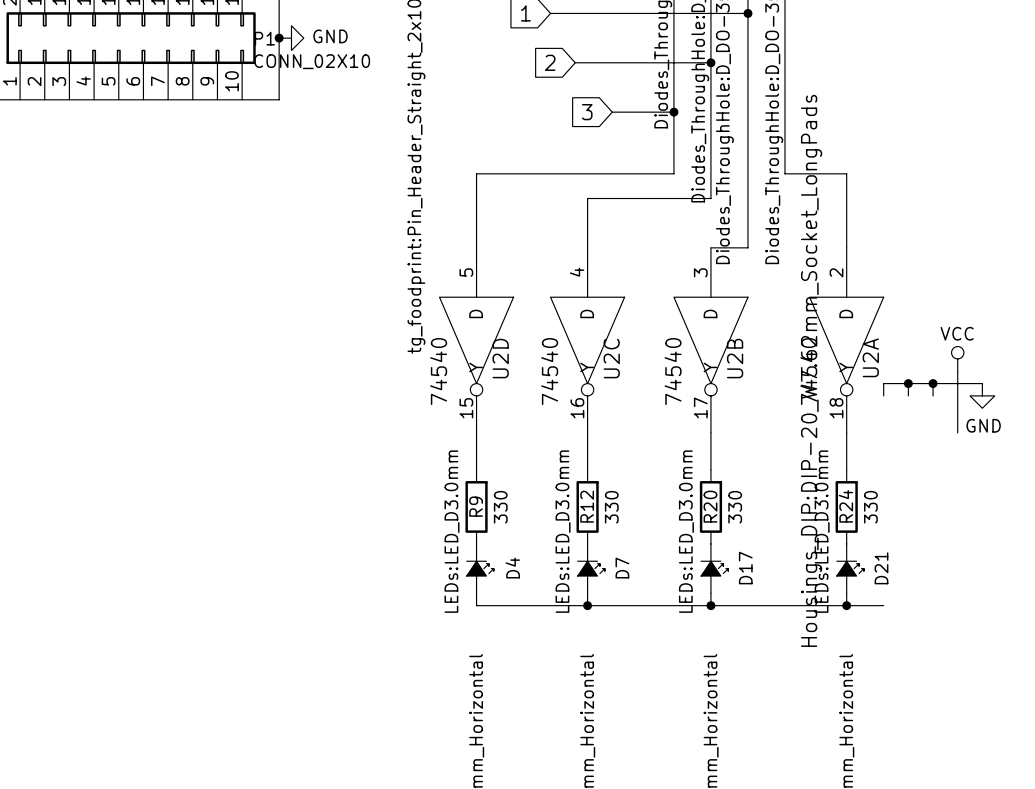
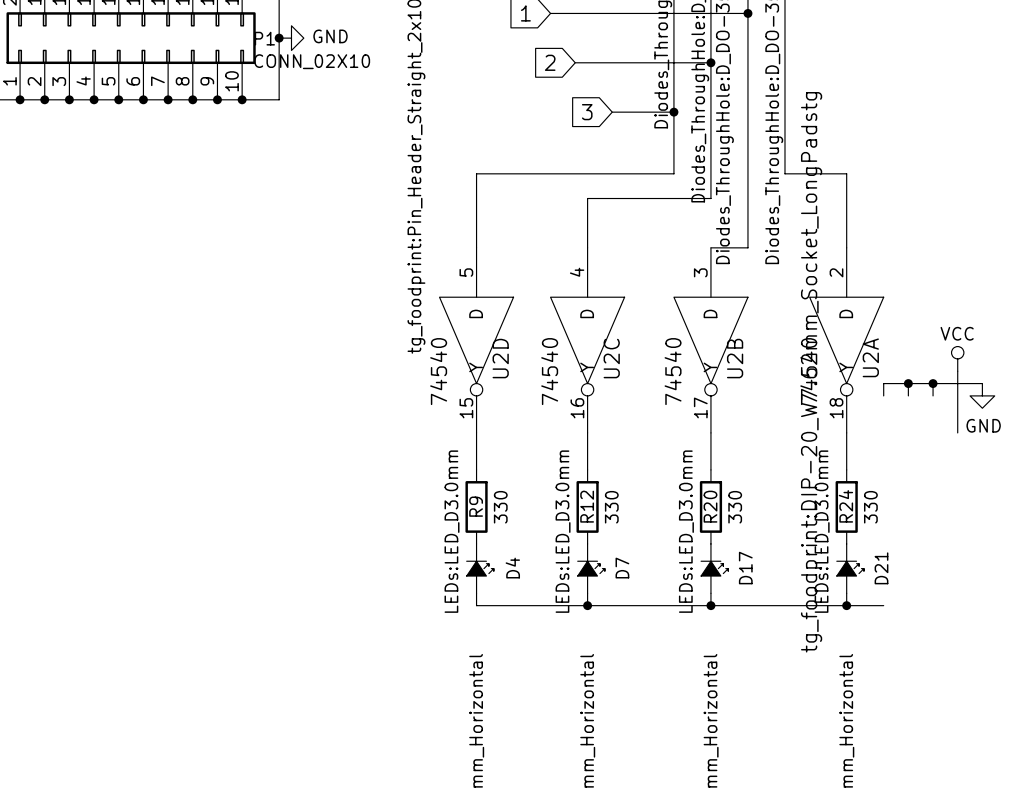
junction: none -> (20, 99)
junction: none -> (44, 99)
junction: none -> (69, 99)
junction: none -> (94, 99)
junction: none -> (118, 99)
junction: none -> (143, 99)
junction: none -> (168, 99)
junction: none -> (192, 99)
junction: none -> (217, 99)
junction: none -> (242, 99)
U2A text: Housings_DIP:DIP-20_W7.62mm_Socket_LongPads (811, 370) -> tg_foodprint:DIP-20_W7.62mm_Socket_LongPadstg (811, 372)

